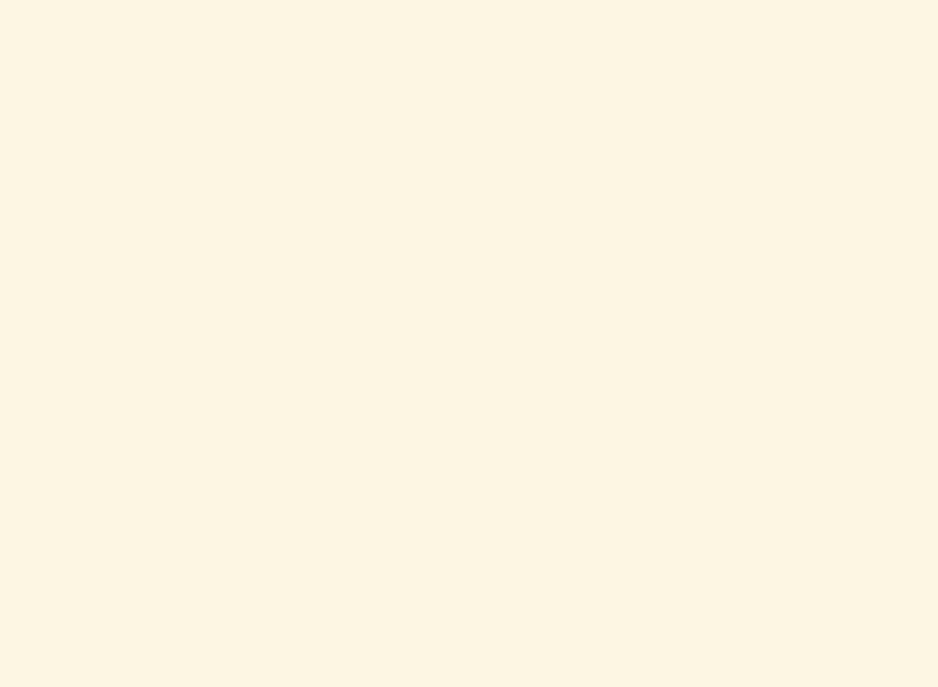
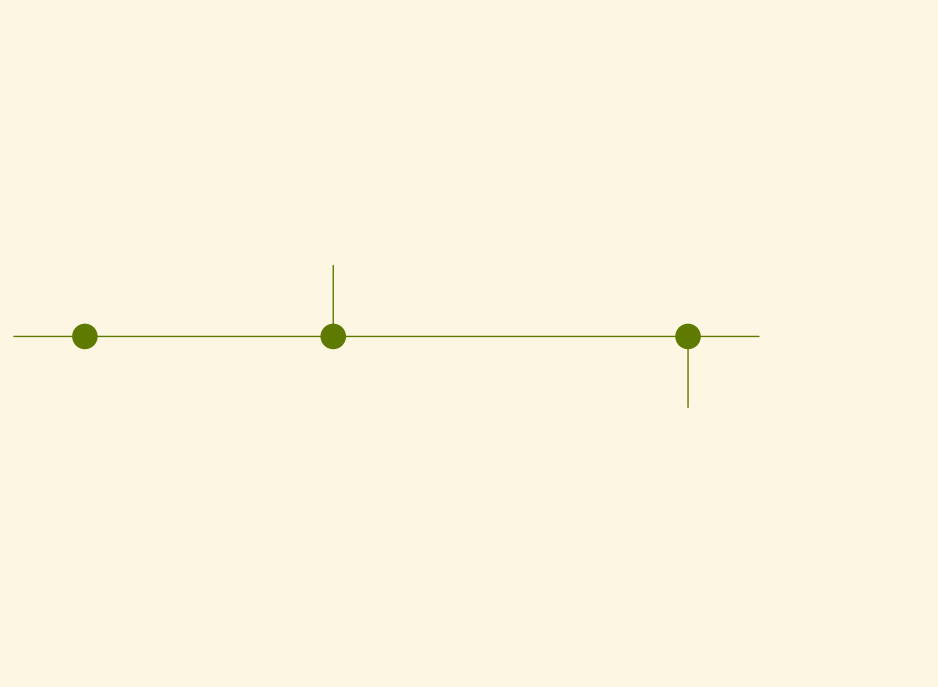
wire: none -> (333, 265) (333, 336)
wire: none -> (13, 336) (758, 336)
junction: none -> (84, 336)
junction: none -> (333, 336)
wire: none -> (688, 336) (688, 407)
junction: none -> (688, 336)

